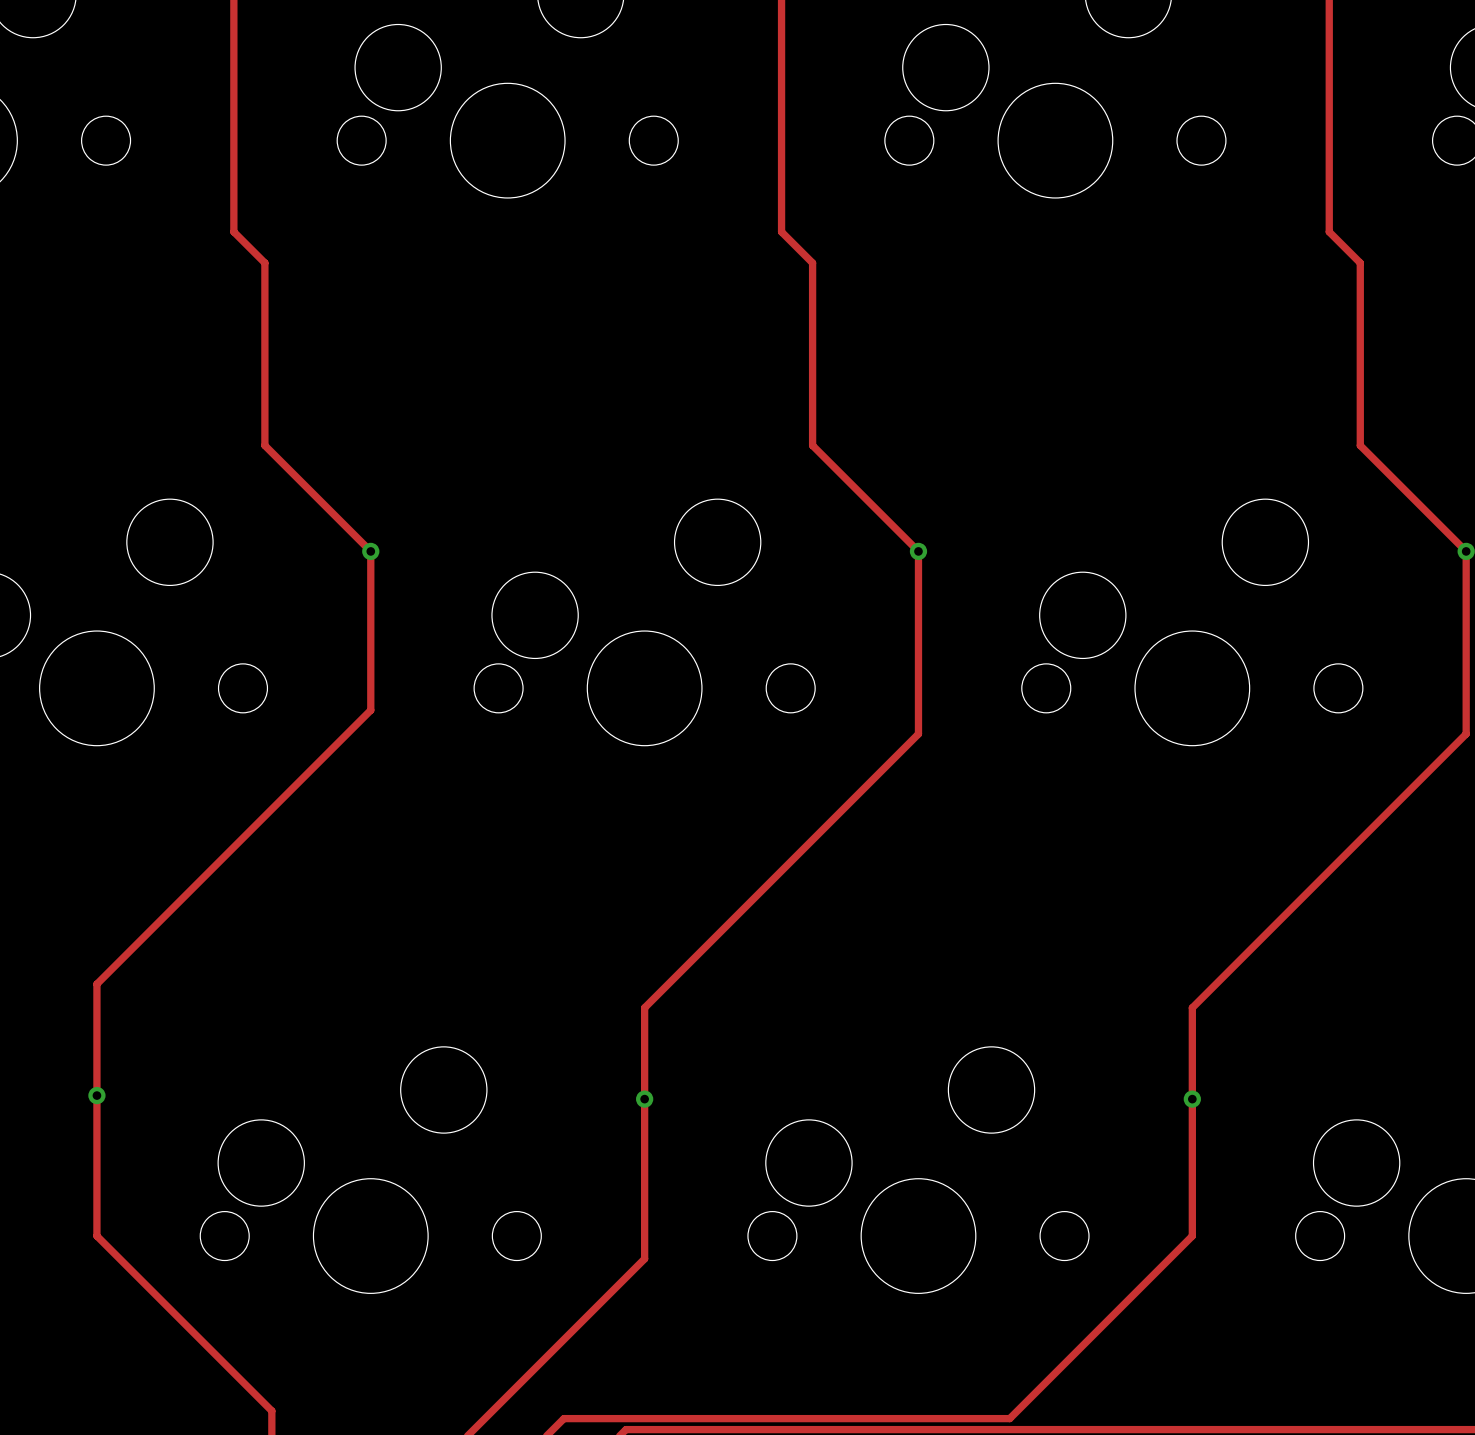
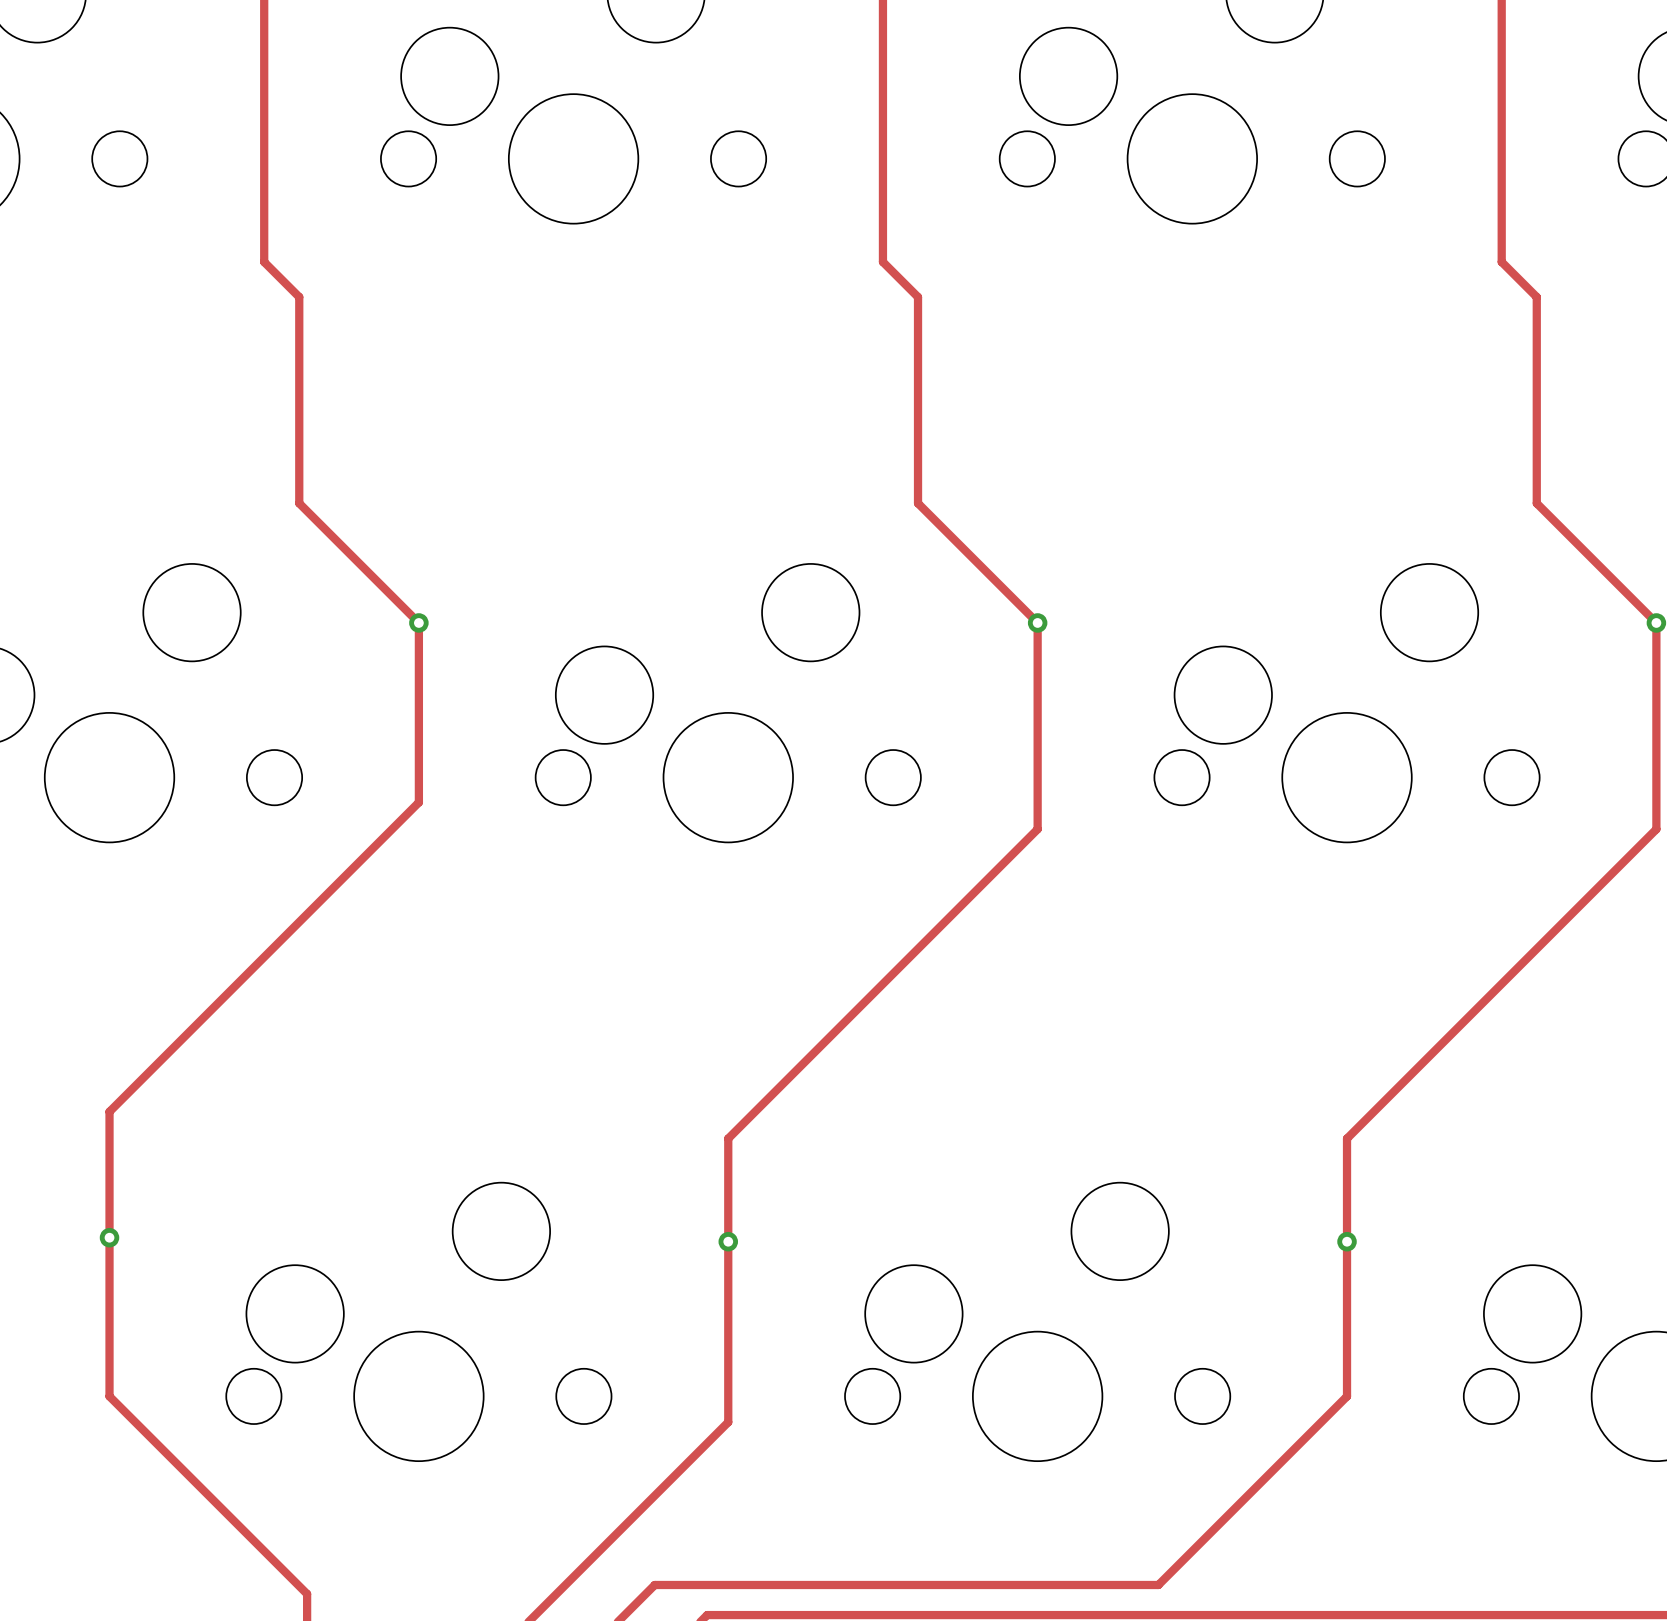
track: (1025, 1402) (1009, 1418) (563, 1418) -> (1158, 1584) (654, 1584) (637, 1602)

